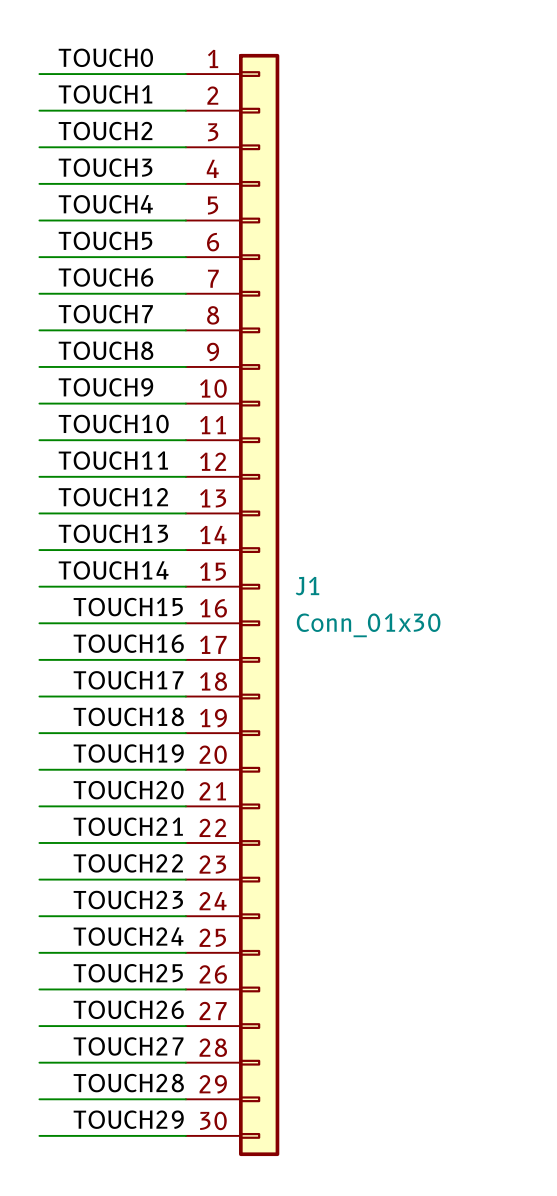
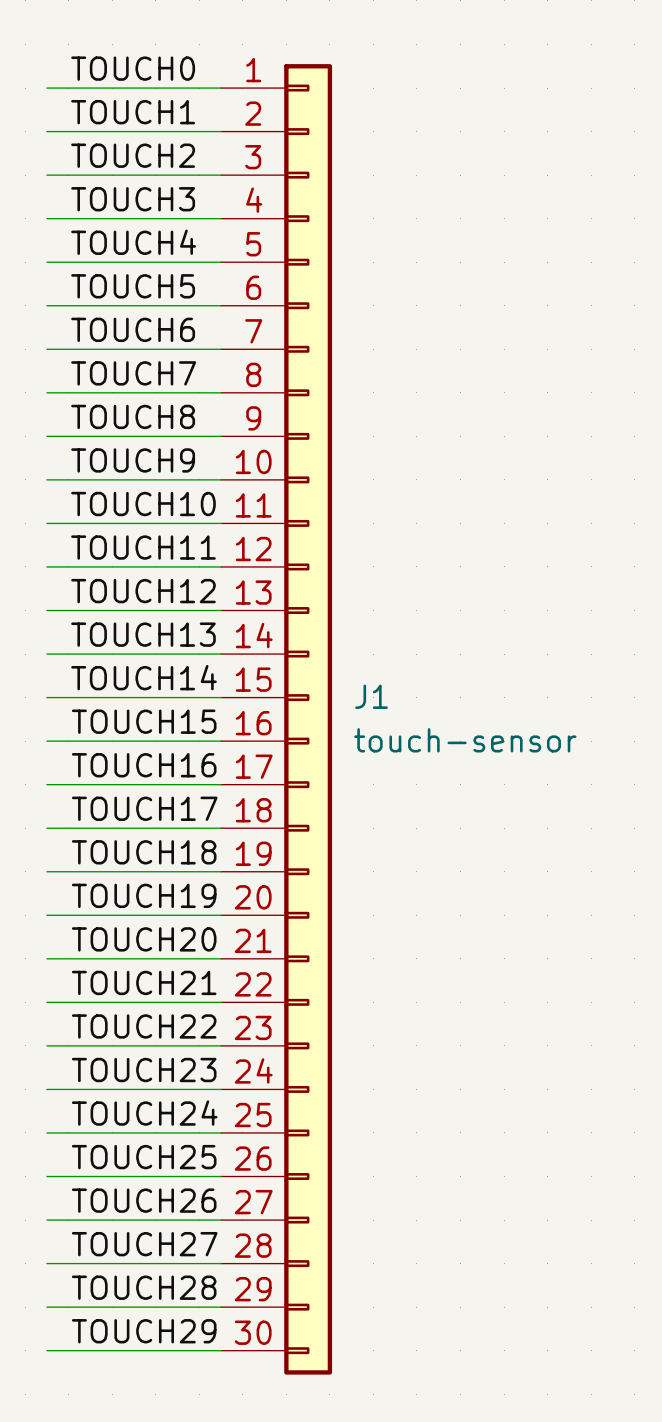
J1 value: Conn_01x30 (368, 625) -> touch-sensor (465, 740)

